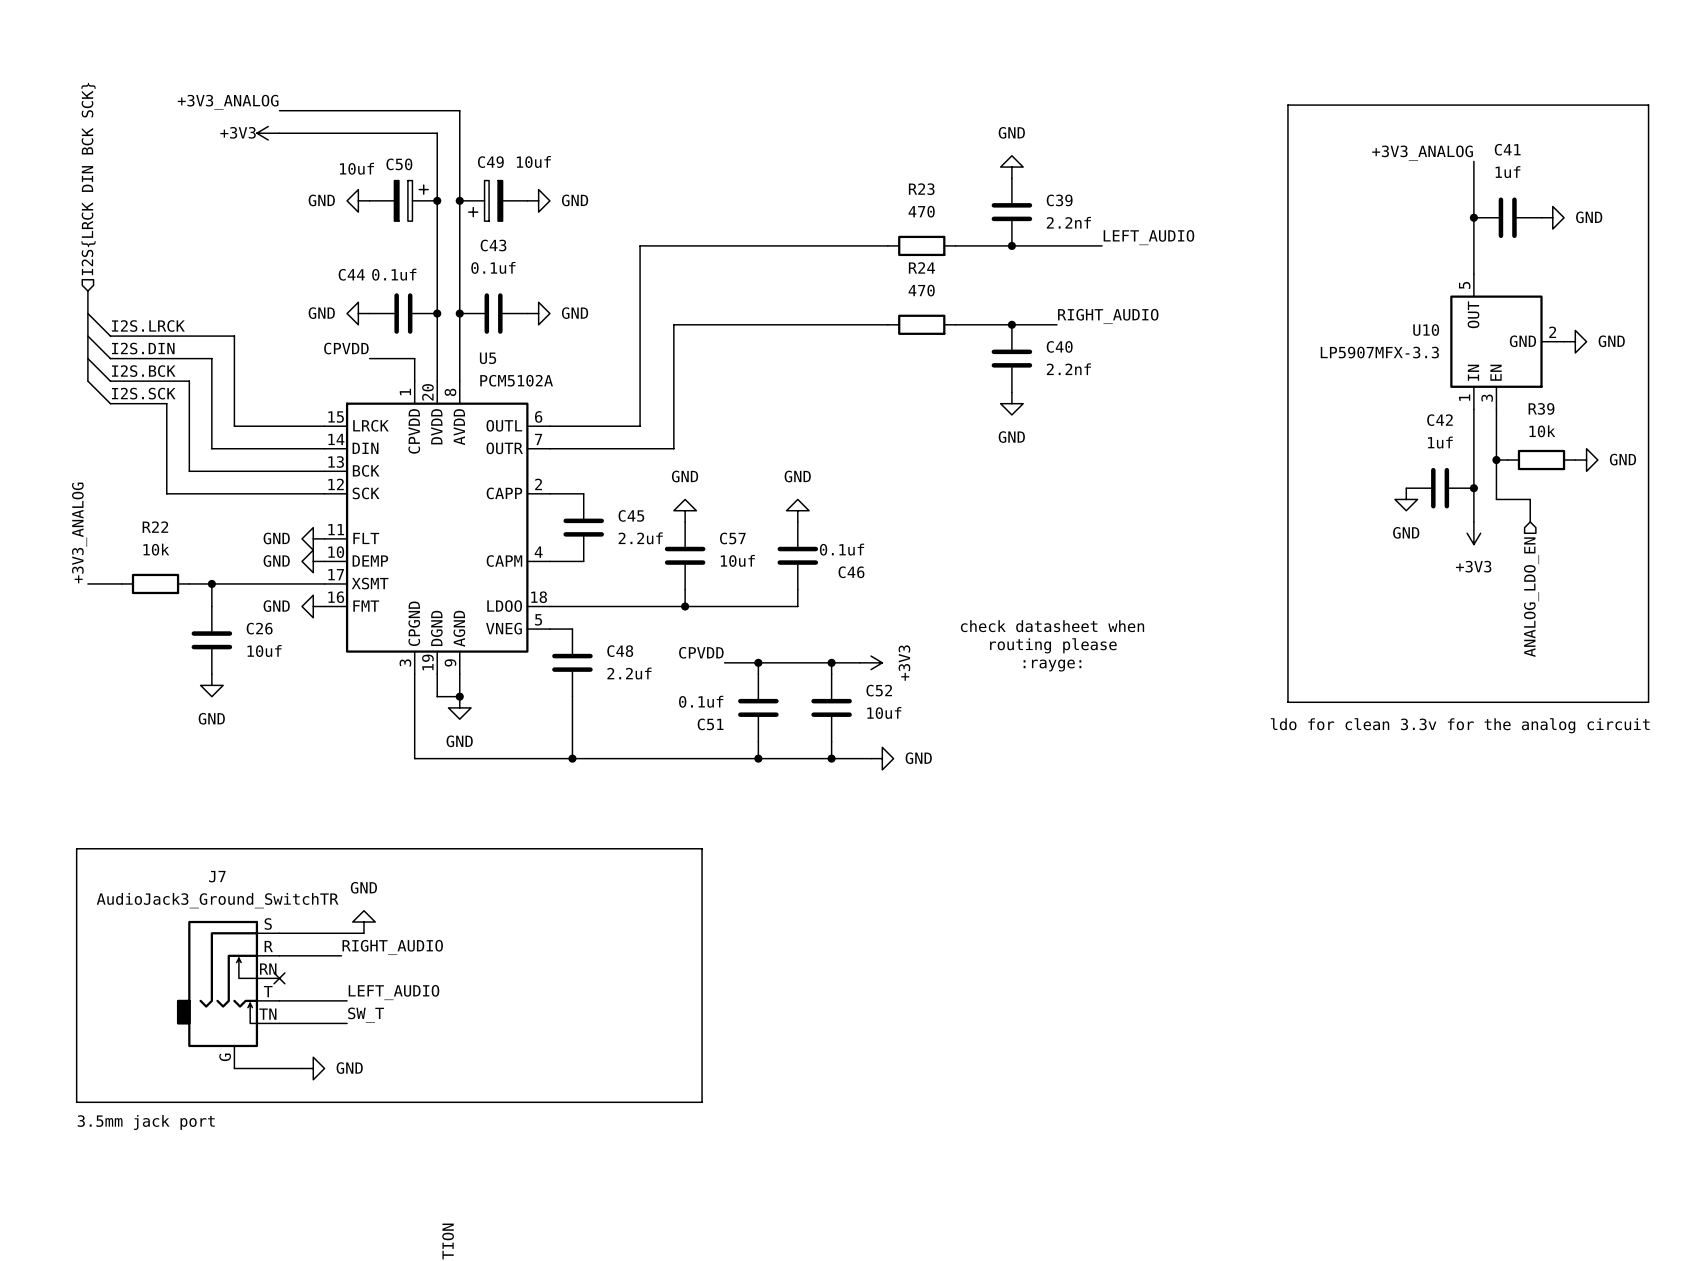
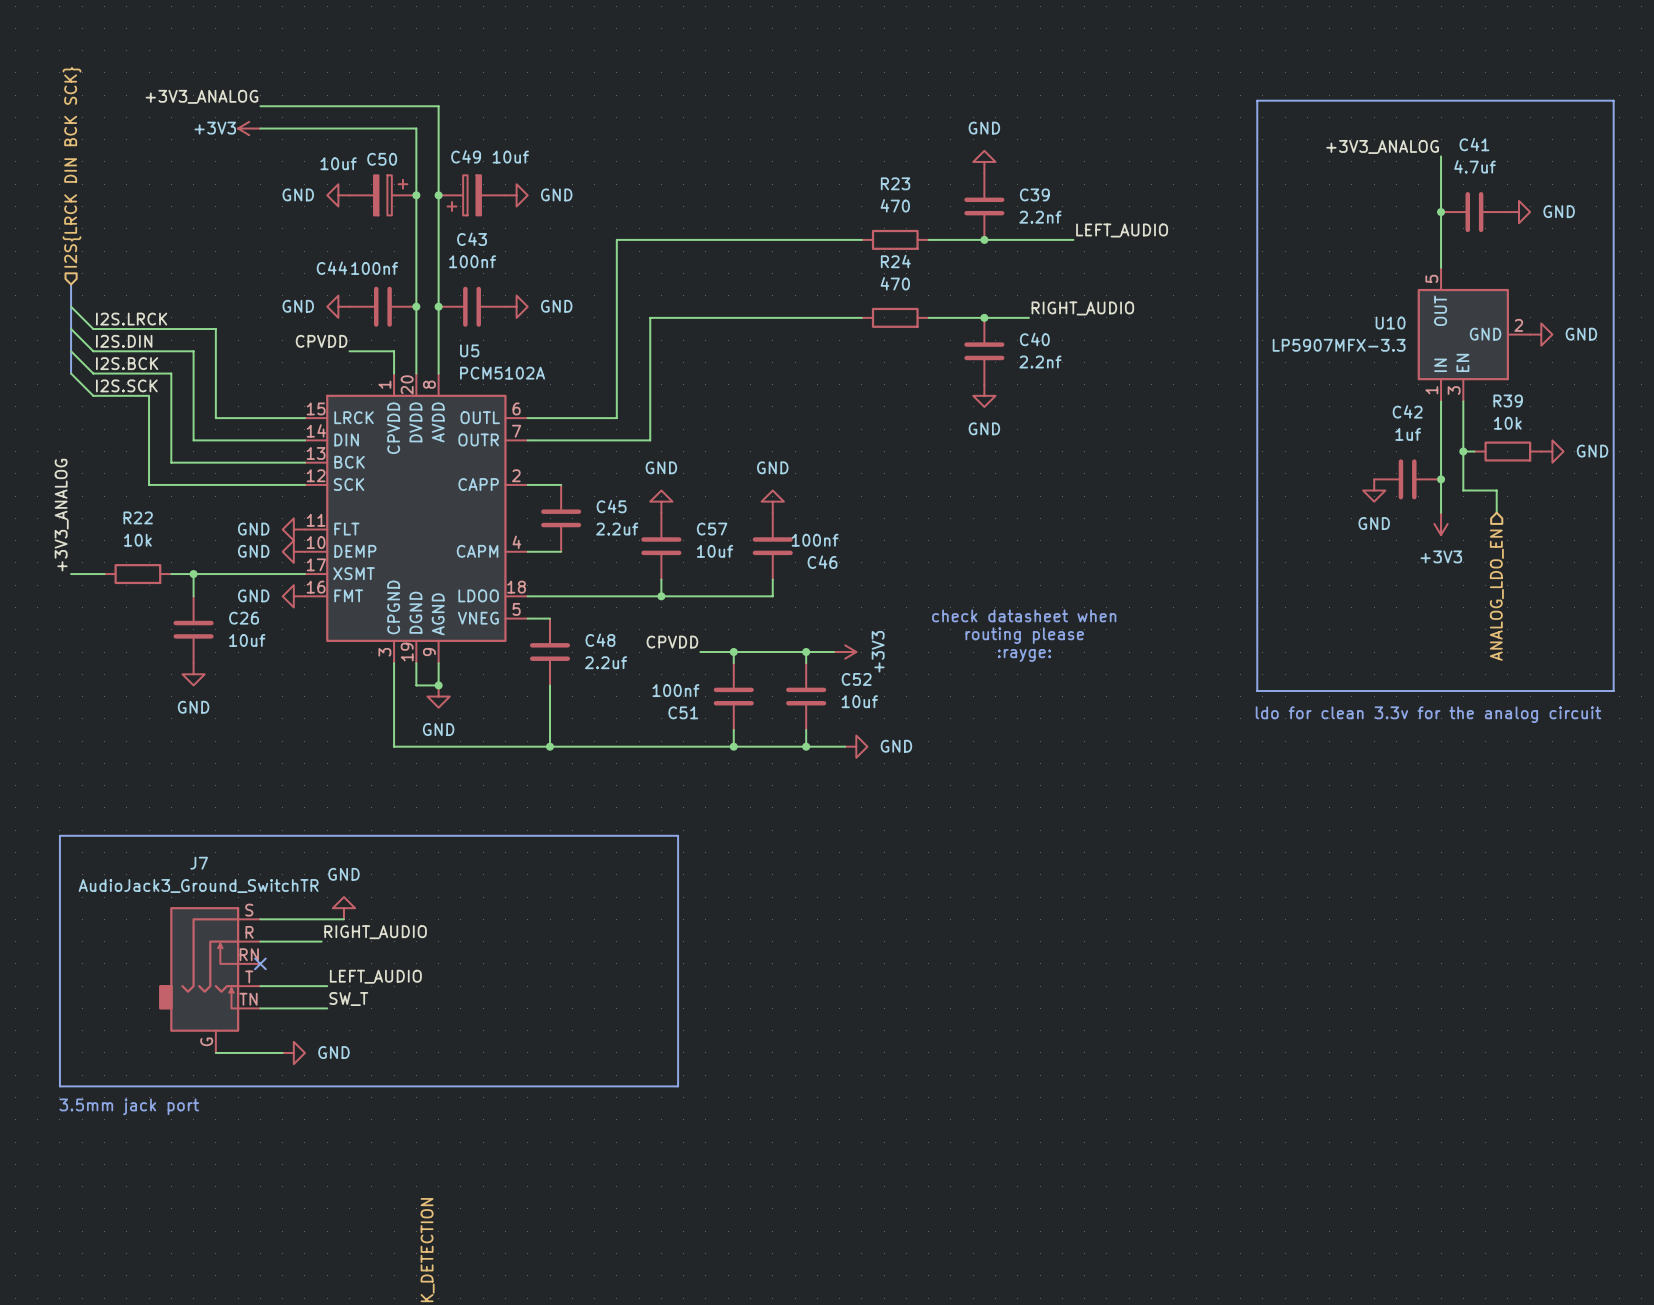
C41 value: 1uf (1507, 172) -> 4.7uf (1474, 166)
C43 value: 0.1uf (493, 267) -> 100nf (472, 261)
C44 value: 0.1uf (394, 274) -> 100nf (374, 268)
C46 value: 0.1uf (842, 549) -> 100nf (815, 540)
C51 value: 0.1uf (701, 701) -> 100nf (675, 690)

